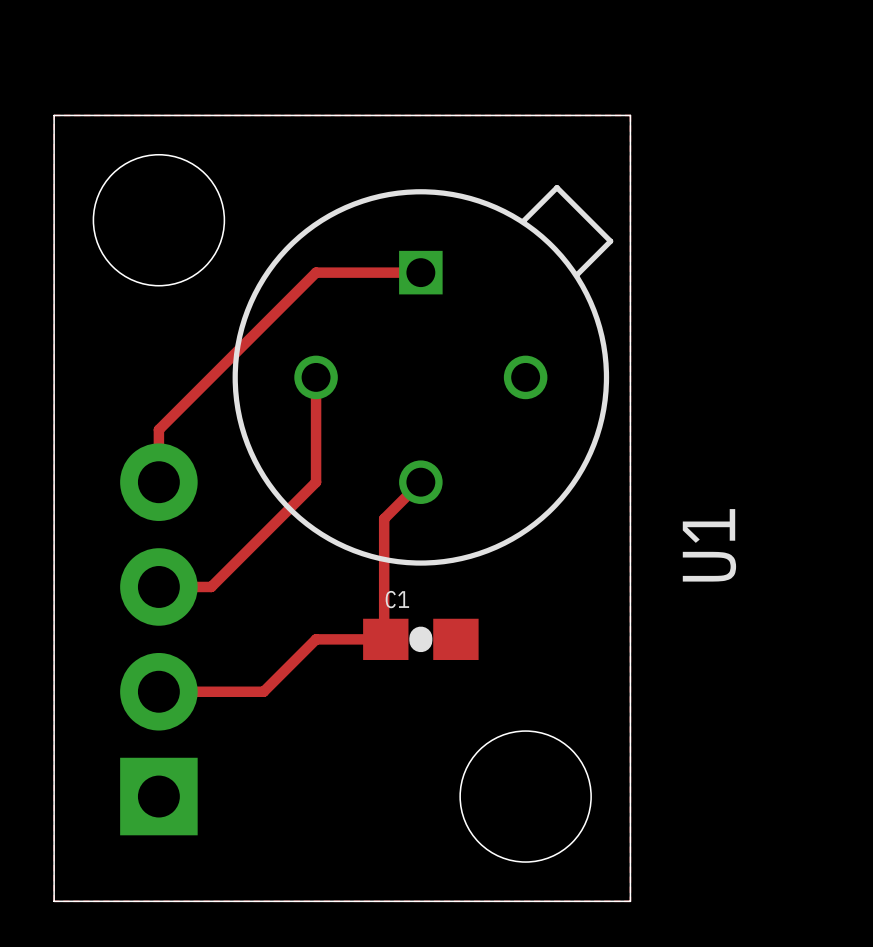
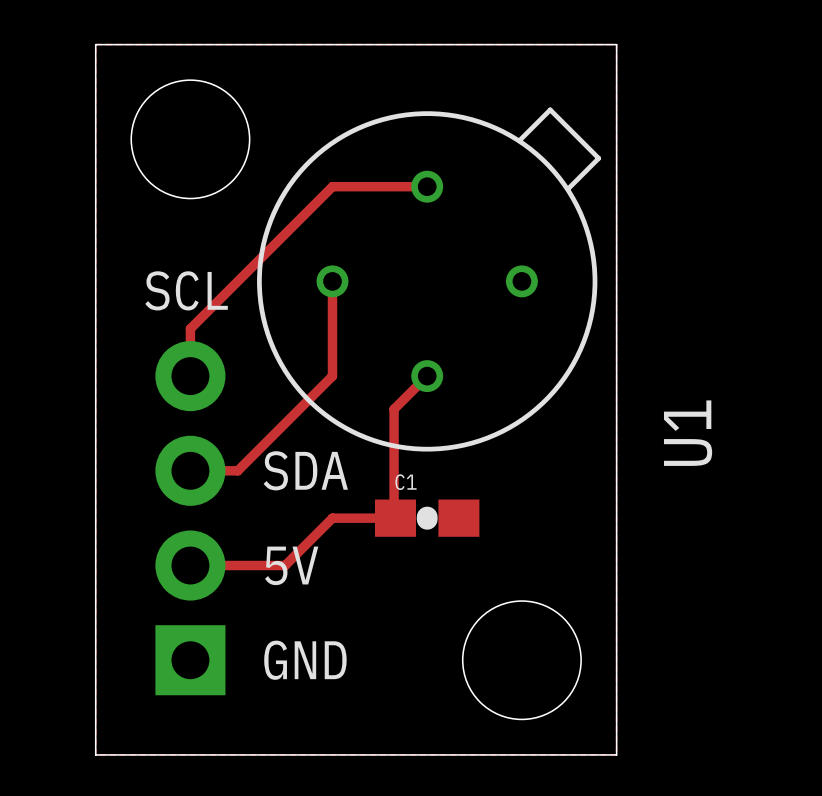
U1 footprint: [232, 185, 614, 566] -> [257, 107, 602, 452]
text: none -> SCL (186, 290)
text: none -> SDA (305, 470)
text: none -> 5V (291, 565)
text: none -> GND (305, 660)

